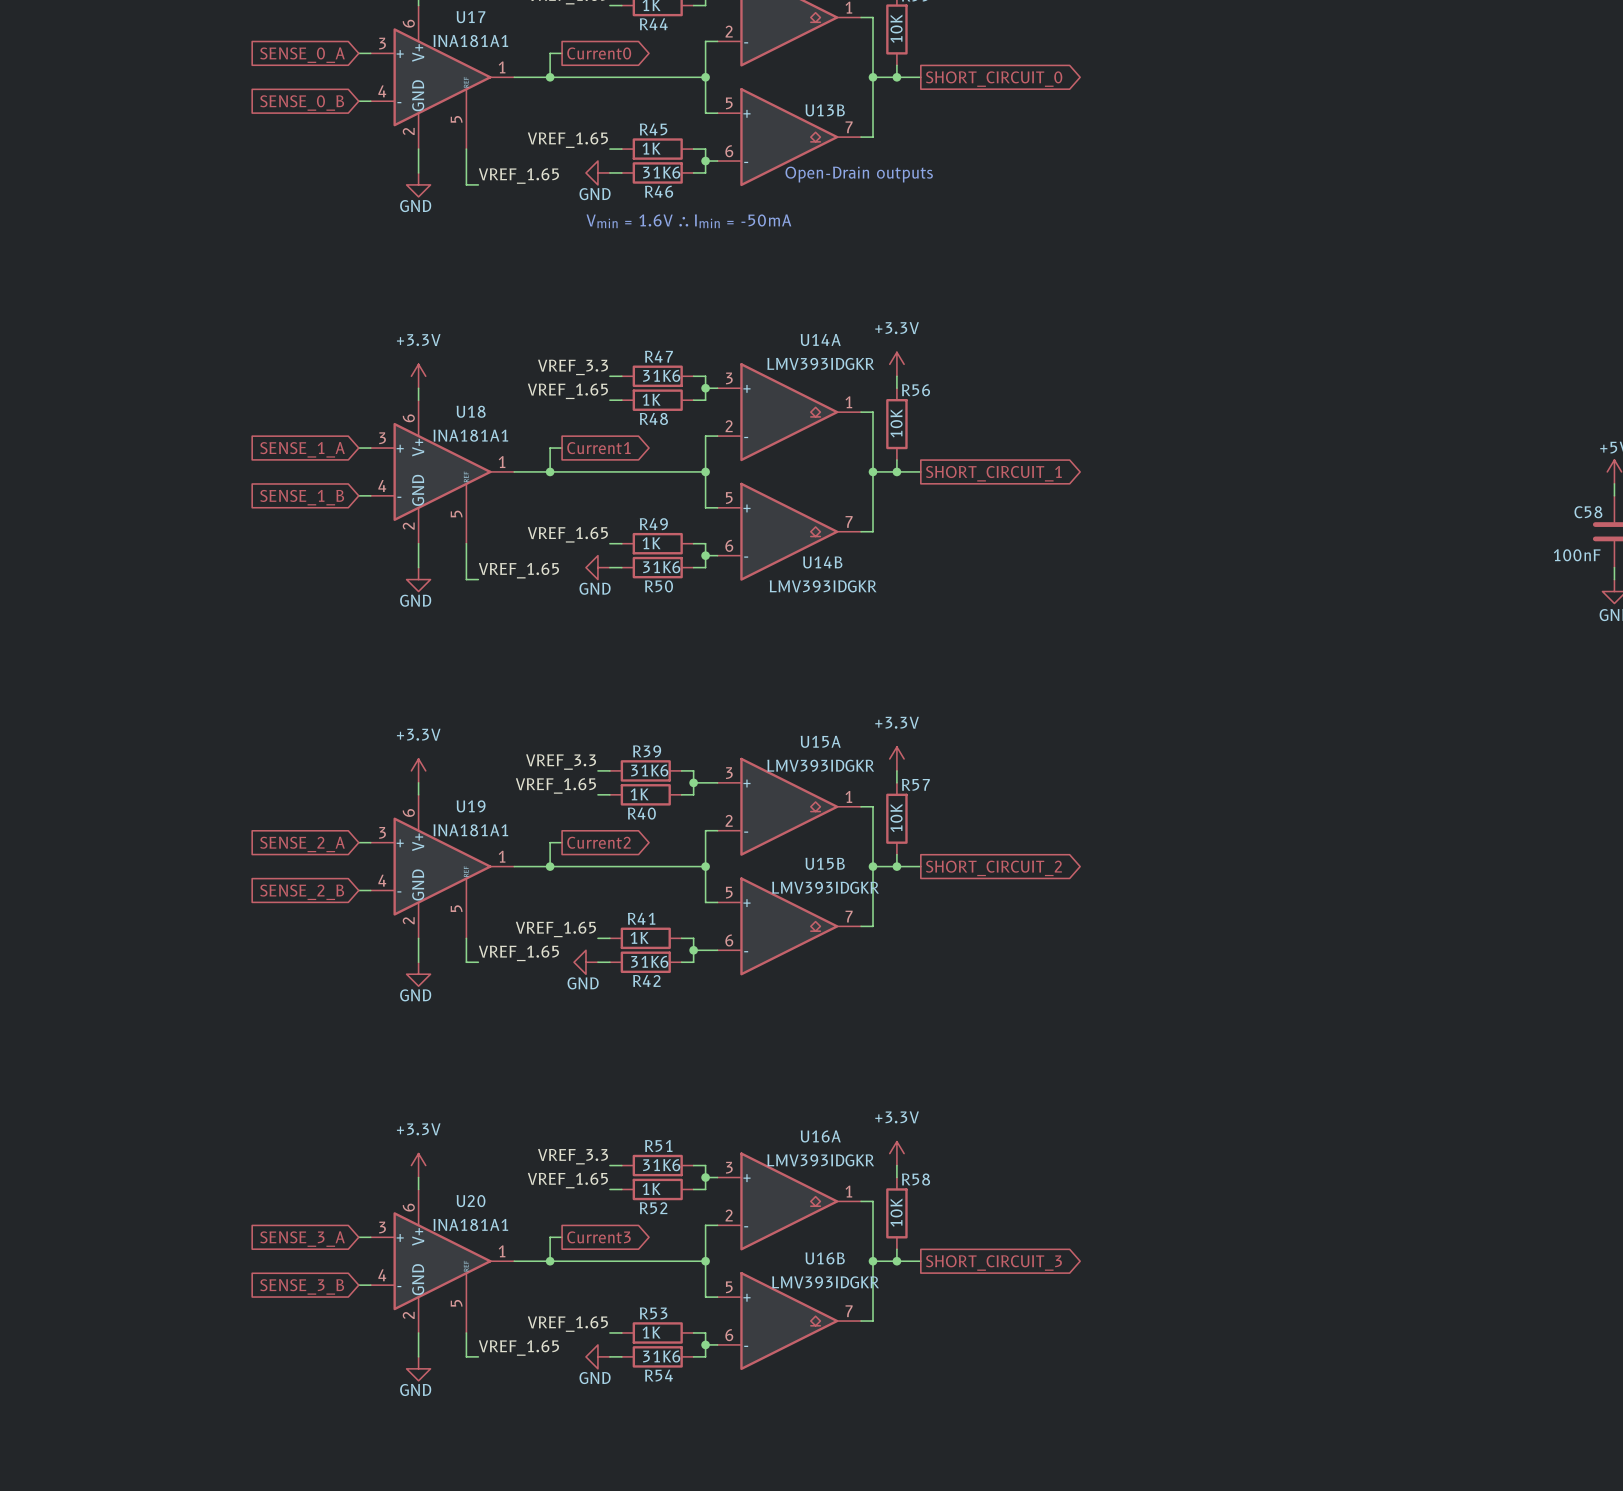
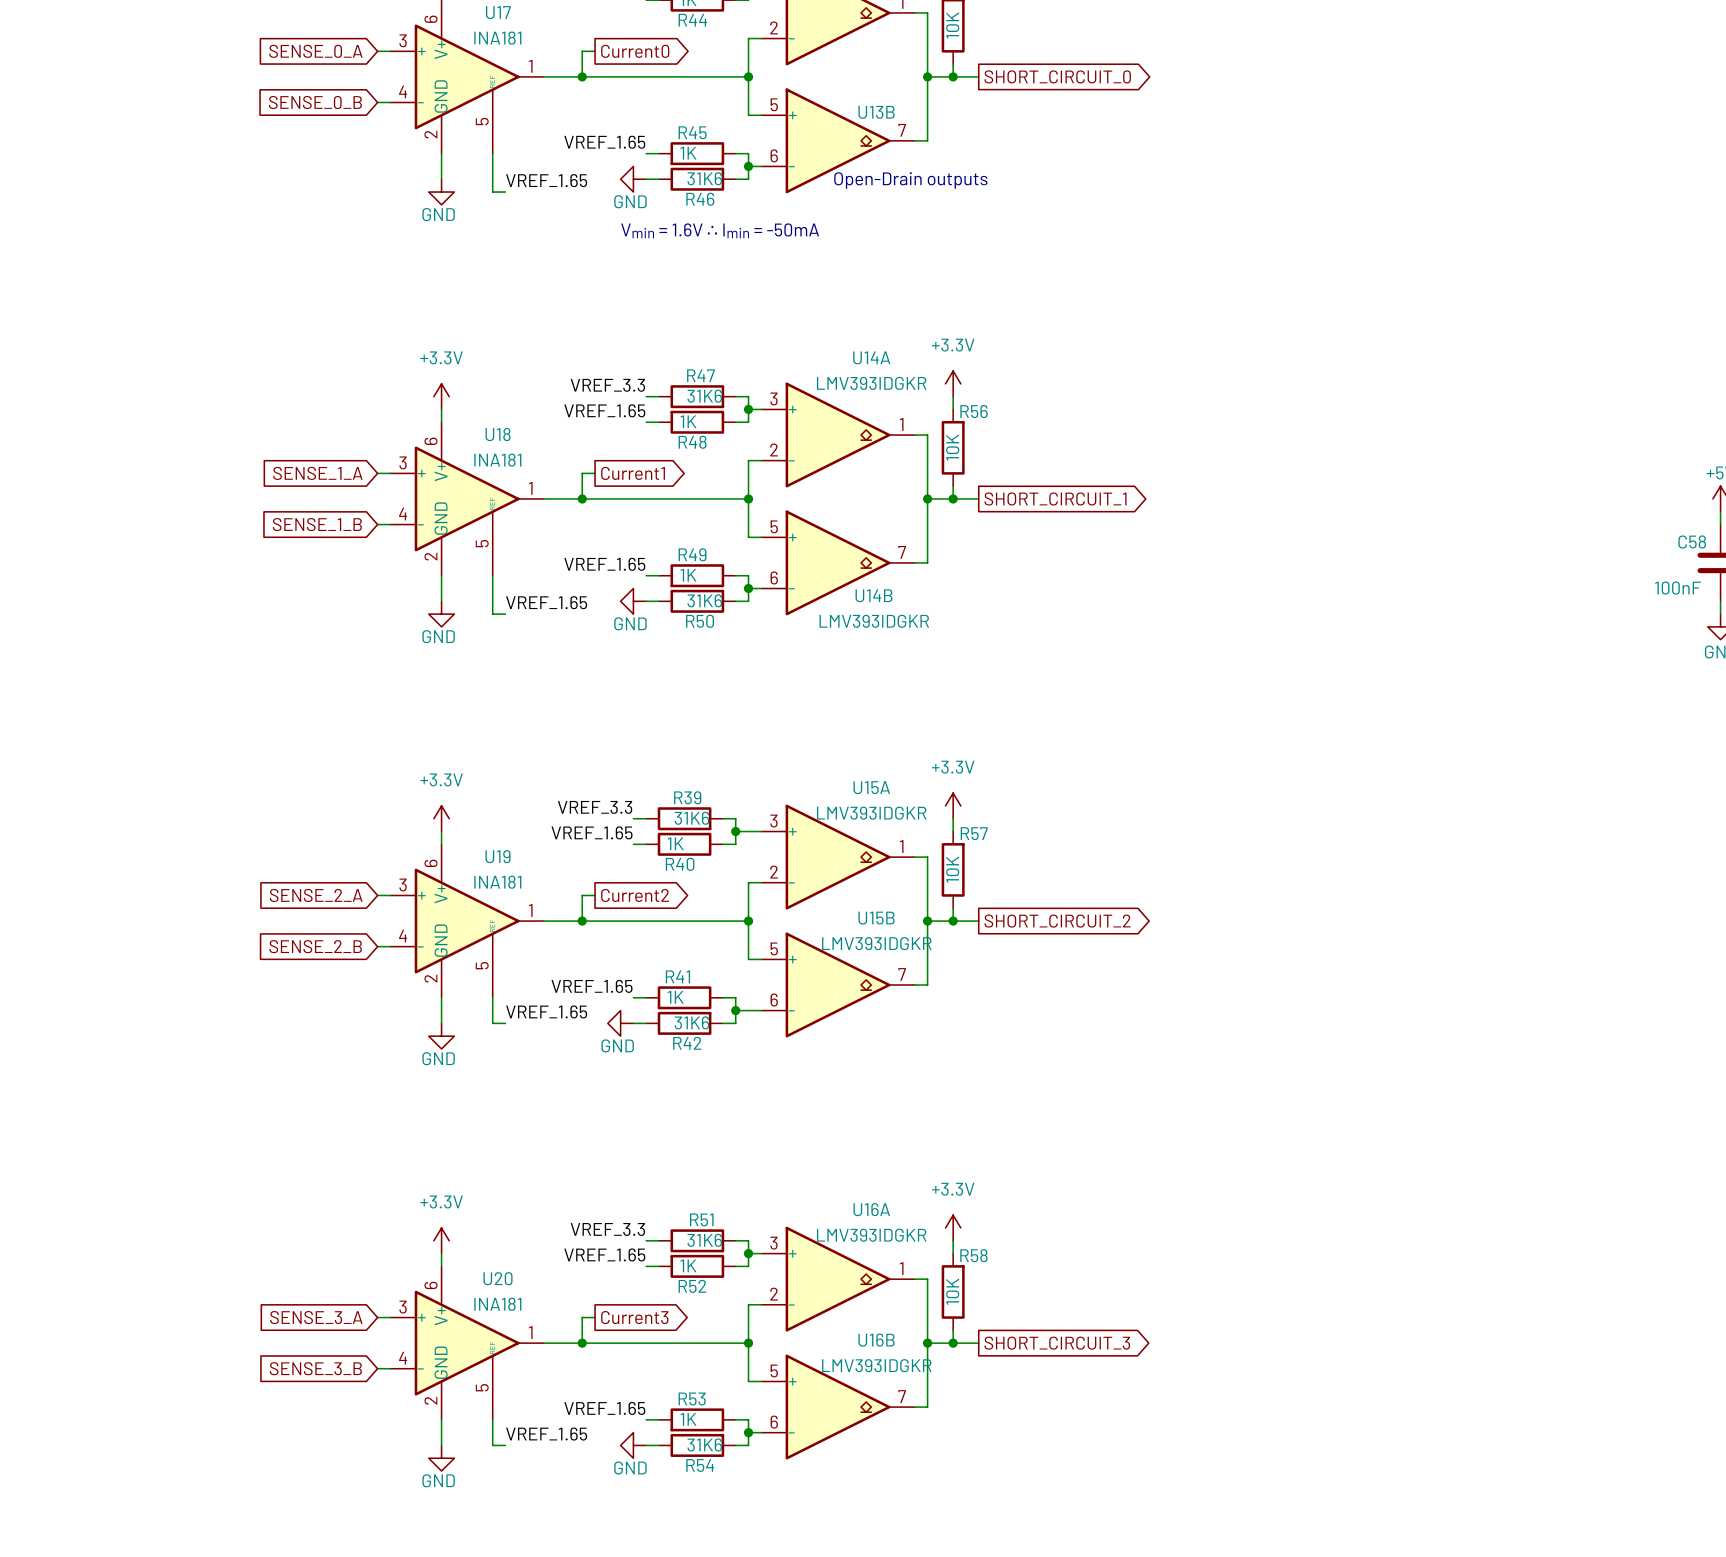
U17 value: INA181A1 (470, 41) -> INA181 (497, 38)
U18 value: INA181A1 (470, 435) -> INA181 (497, 460)
U19 value: INA181A1 (470, 830) -> INA181 (497, 882)
U20 value: INA181A1 (470, 1224) -> INA181 (497, 1304)

